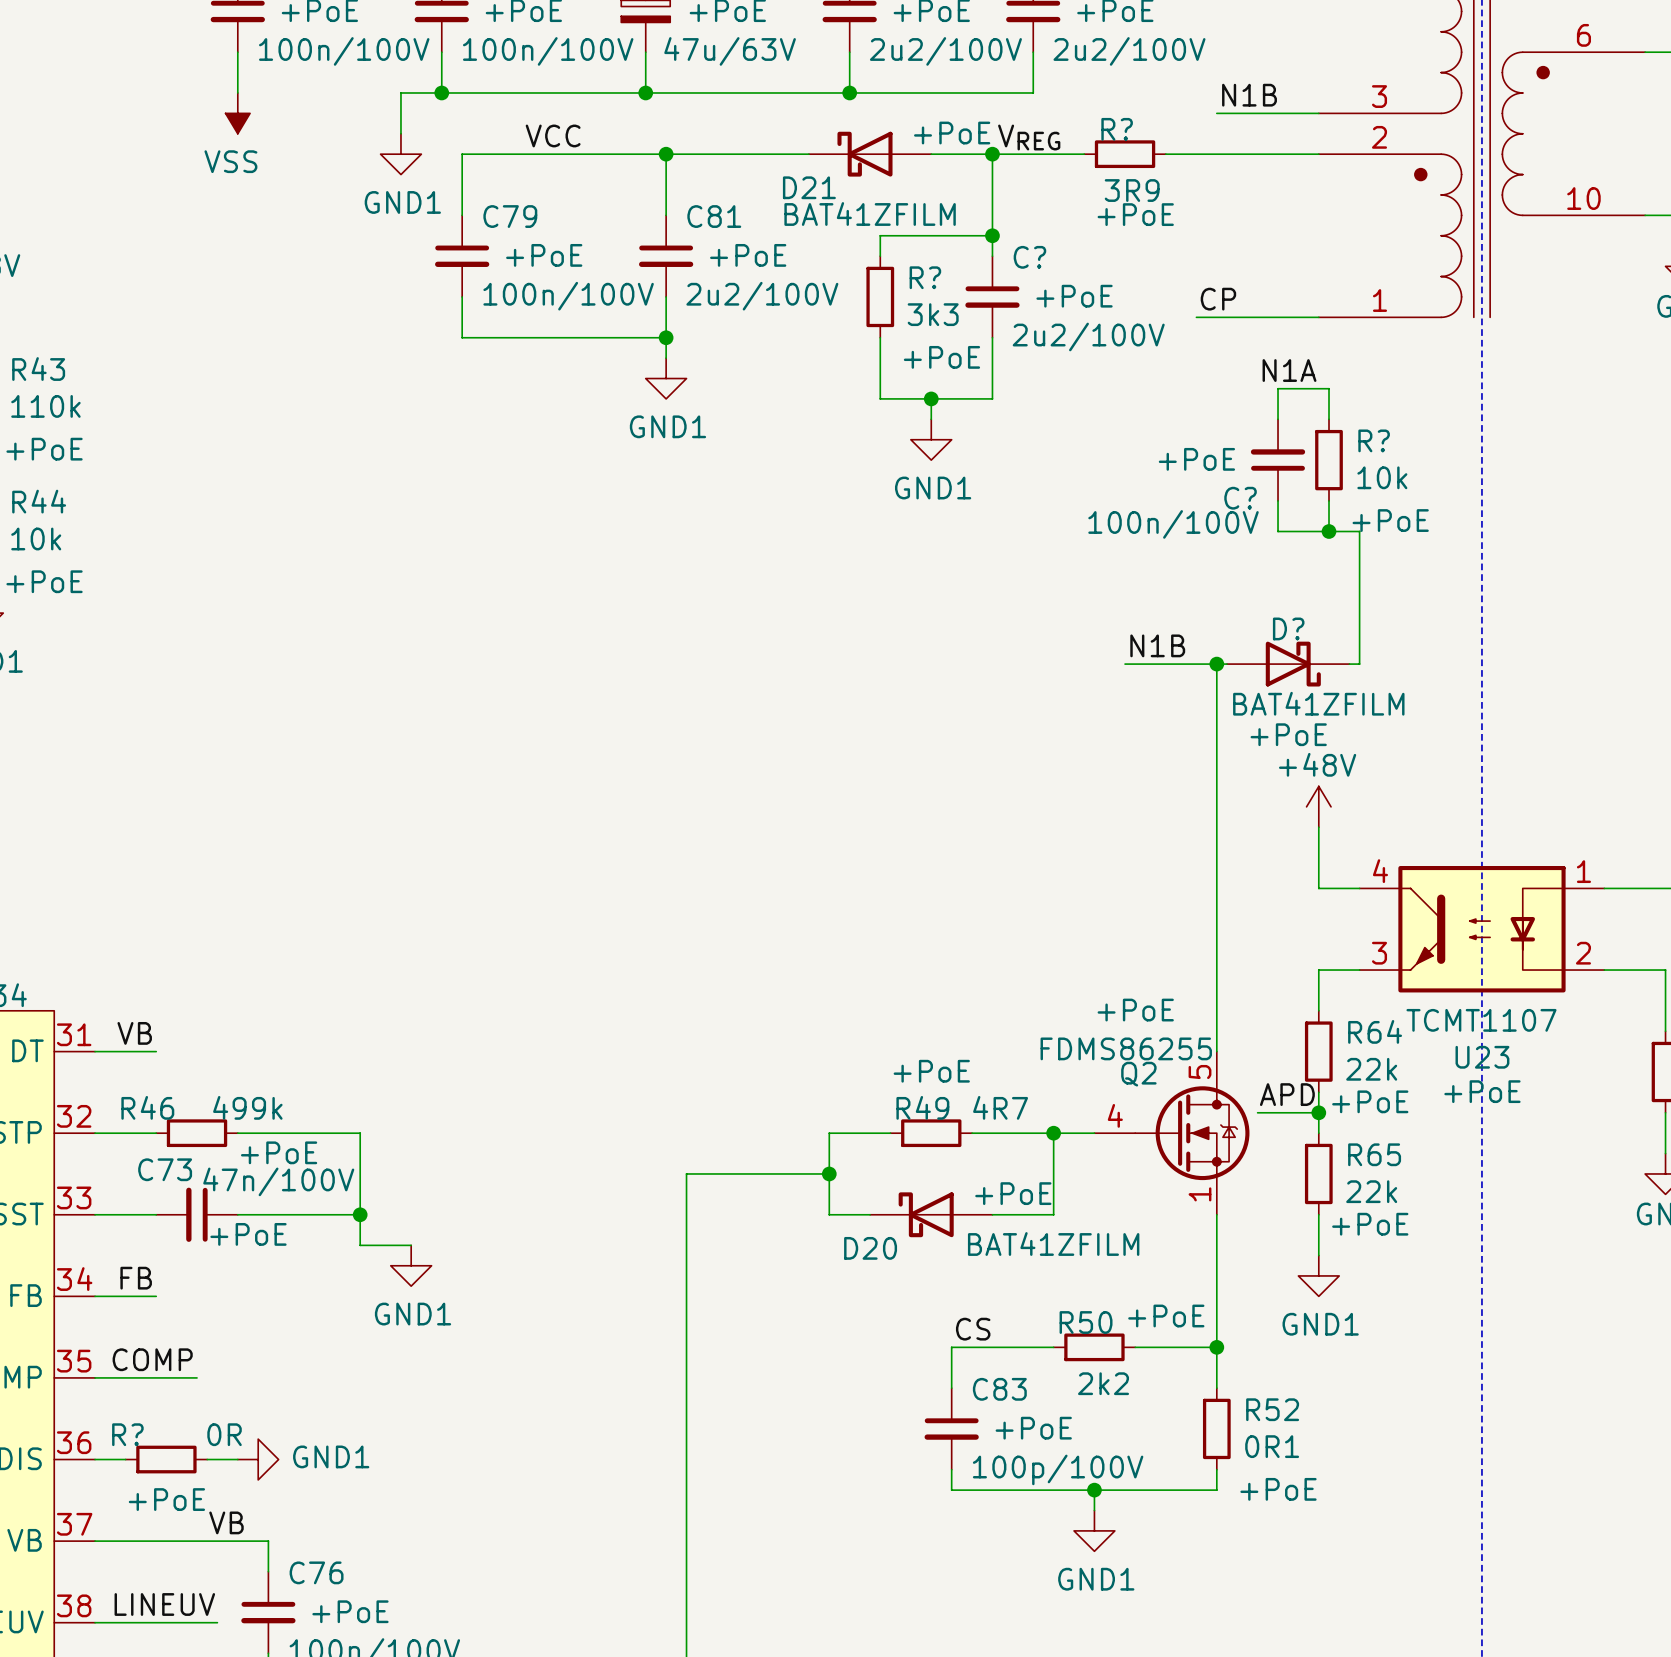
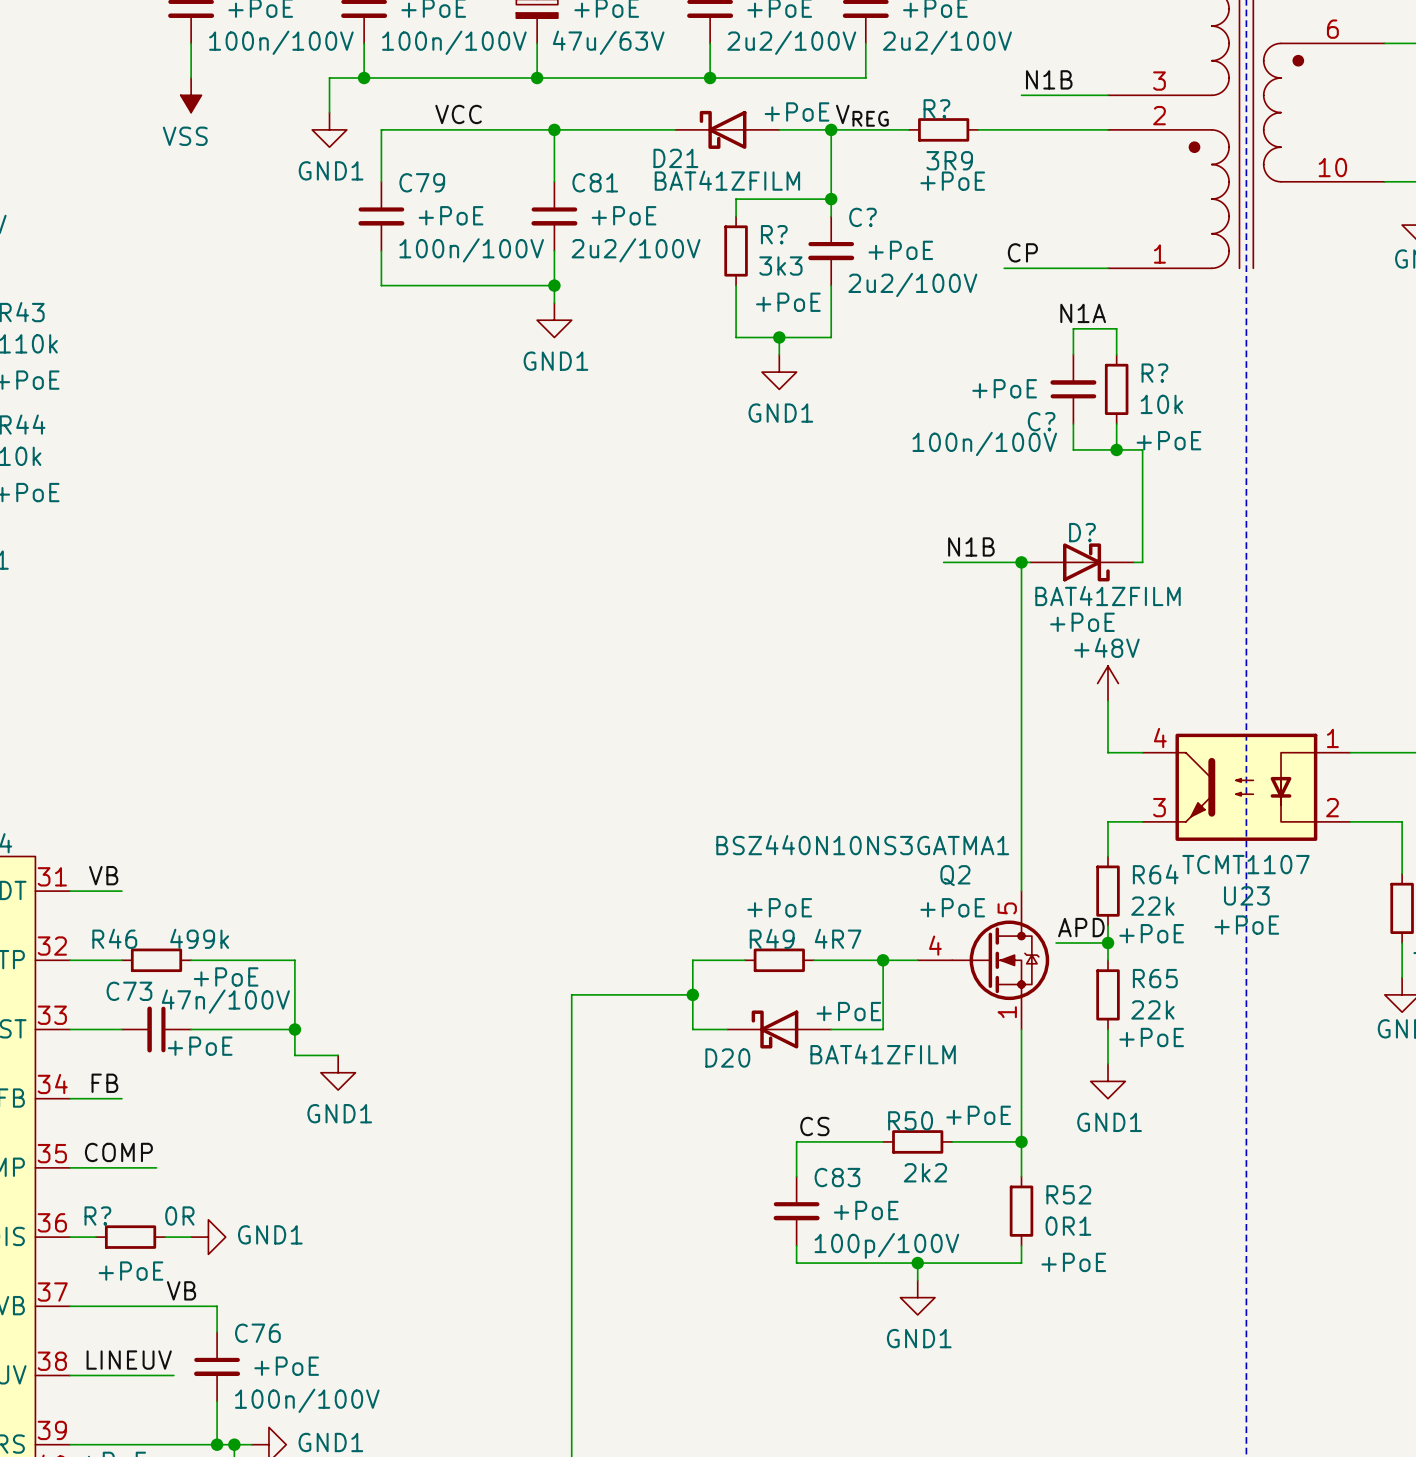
Q2 text position: +PoE (1135, 1010) -> +PoE (952, 907)
Q2 value: FDMS86255 (1126, 1048) -> BSZ440N10NS3GATMA1 (862, 845)
Q2 name position: Q2 (1138, 1074) -> Q2 (955, 875)

